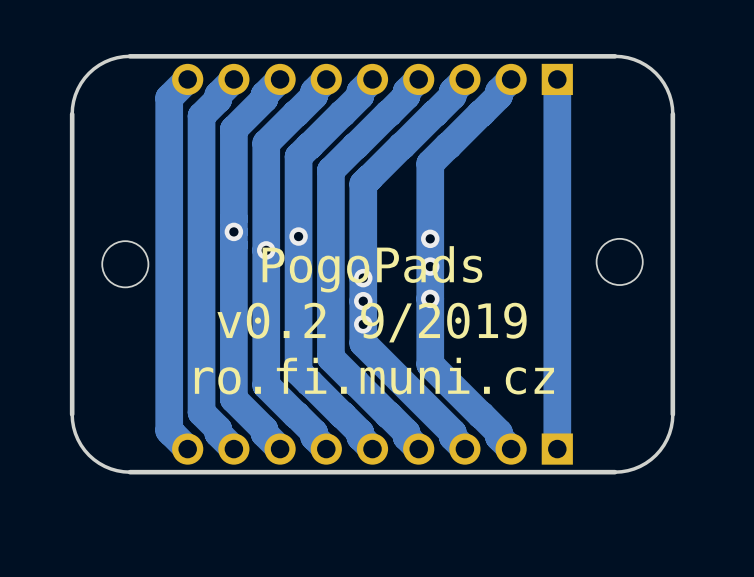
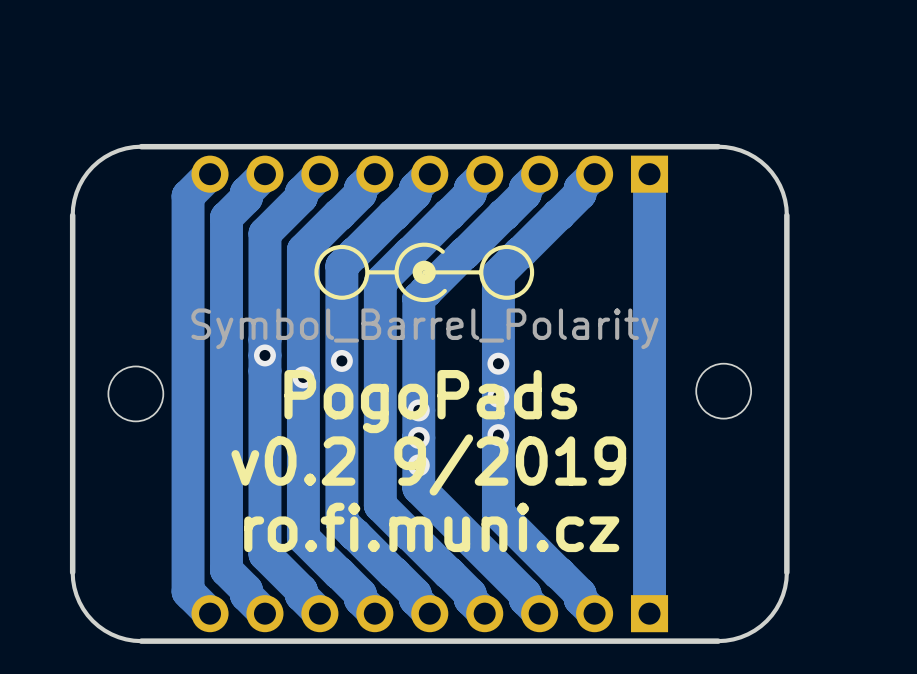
drawing: none -> [314, 242, 535, 303]

